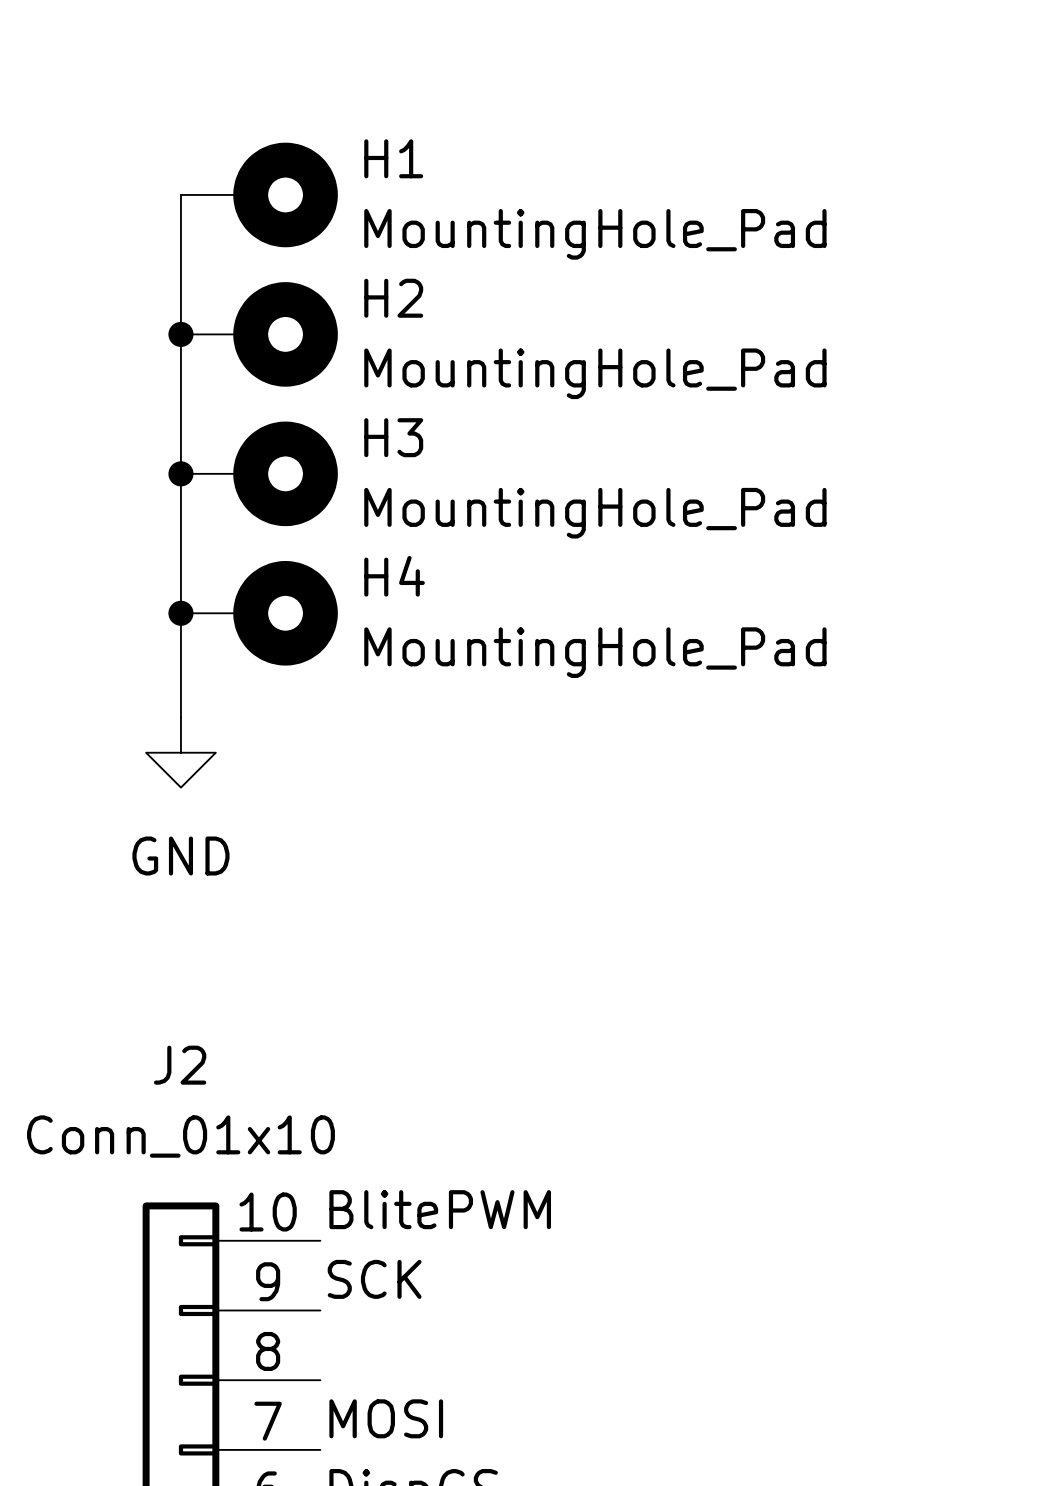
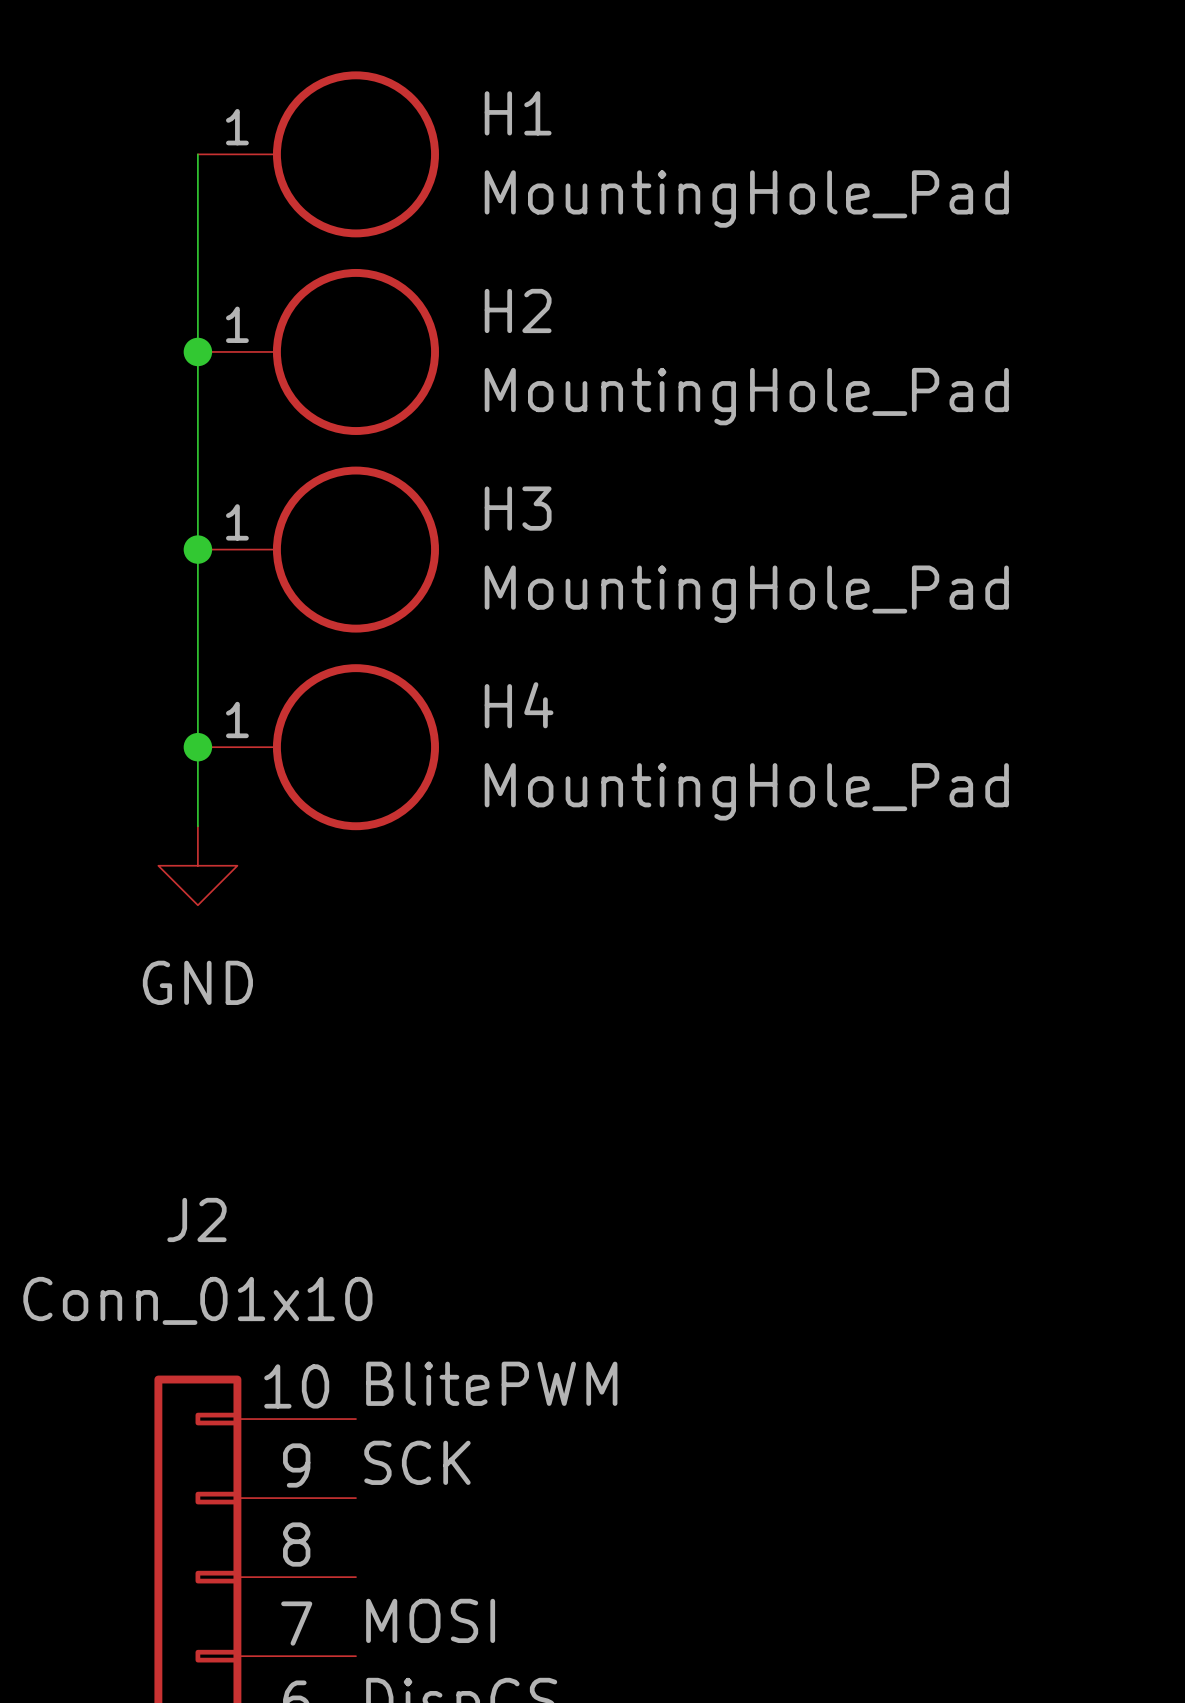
wire: none -> (197, 154) (197, 233)
H1 symbol: [180, 142, 338, 248] -> [197, 71, 439, 238]
H2 symbol: [180, 282, 338, 387] -> [197, 268, 439, 435]
junction position: (180, 334) -> (197, 351)
H3 symbol: [180, 421, 338, 527] -> [197, 466, 439, 633]
H4 symbol: [180, 561, 338, 666] -> [197, 664, 439, 831]
junction position: (180, 613) -> (197, 747)

